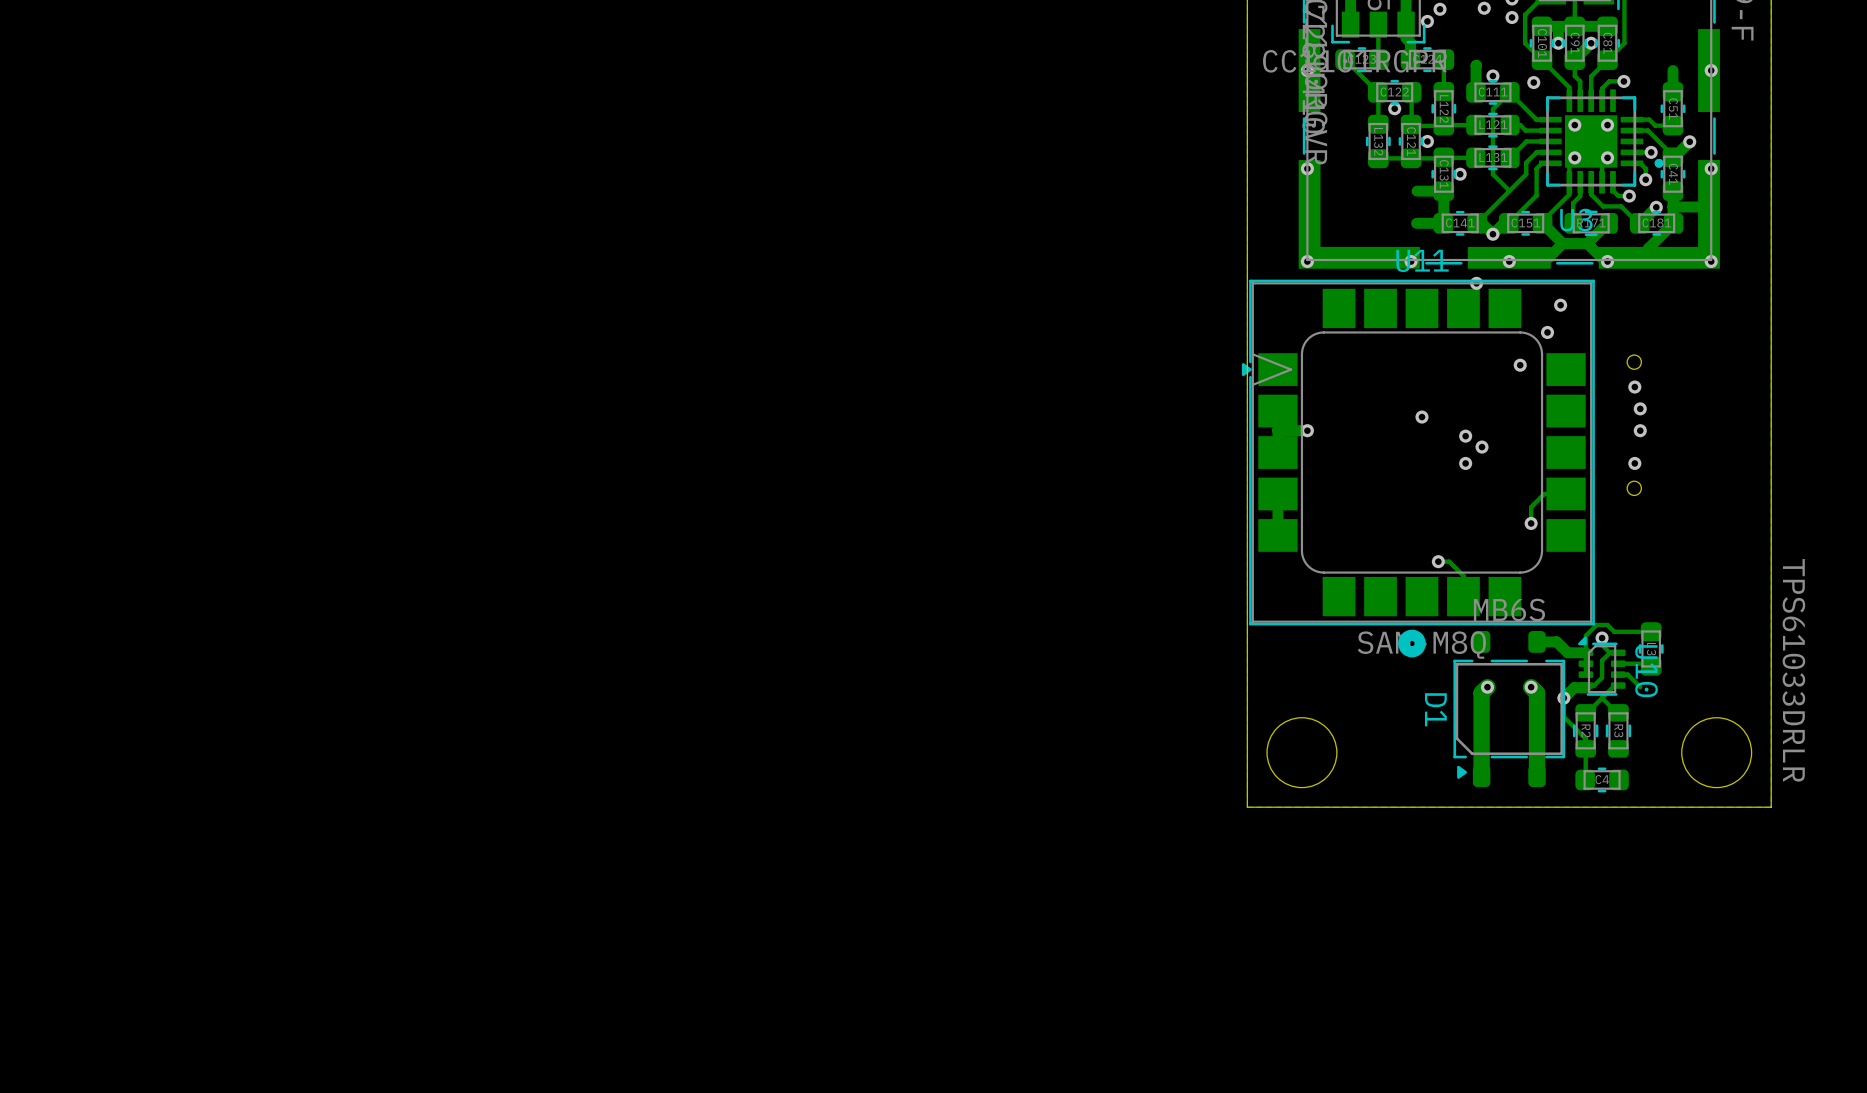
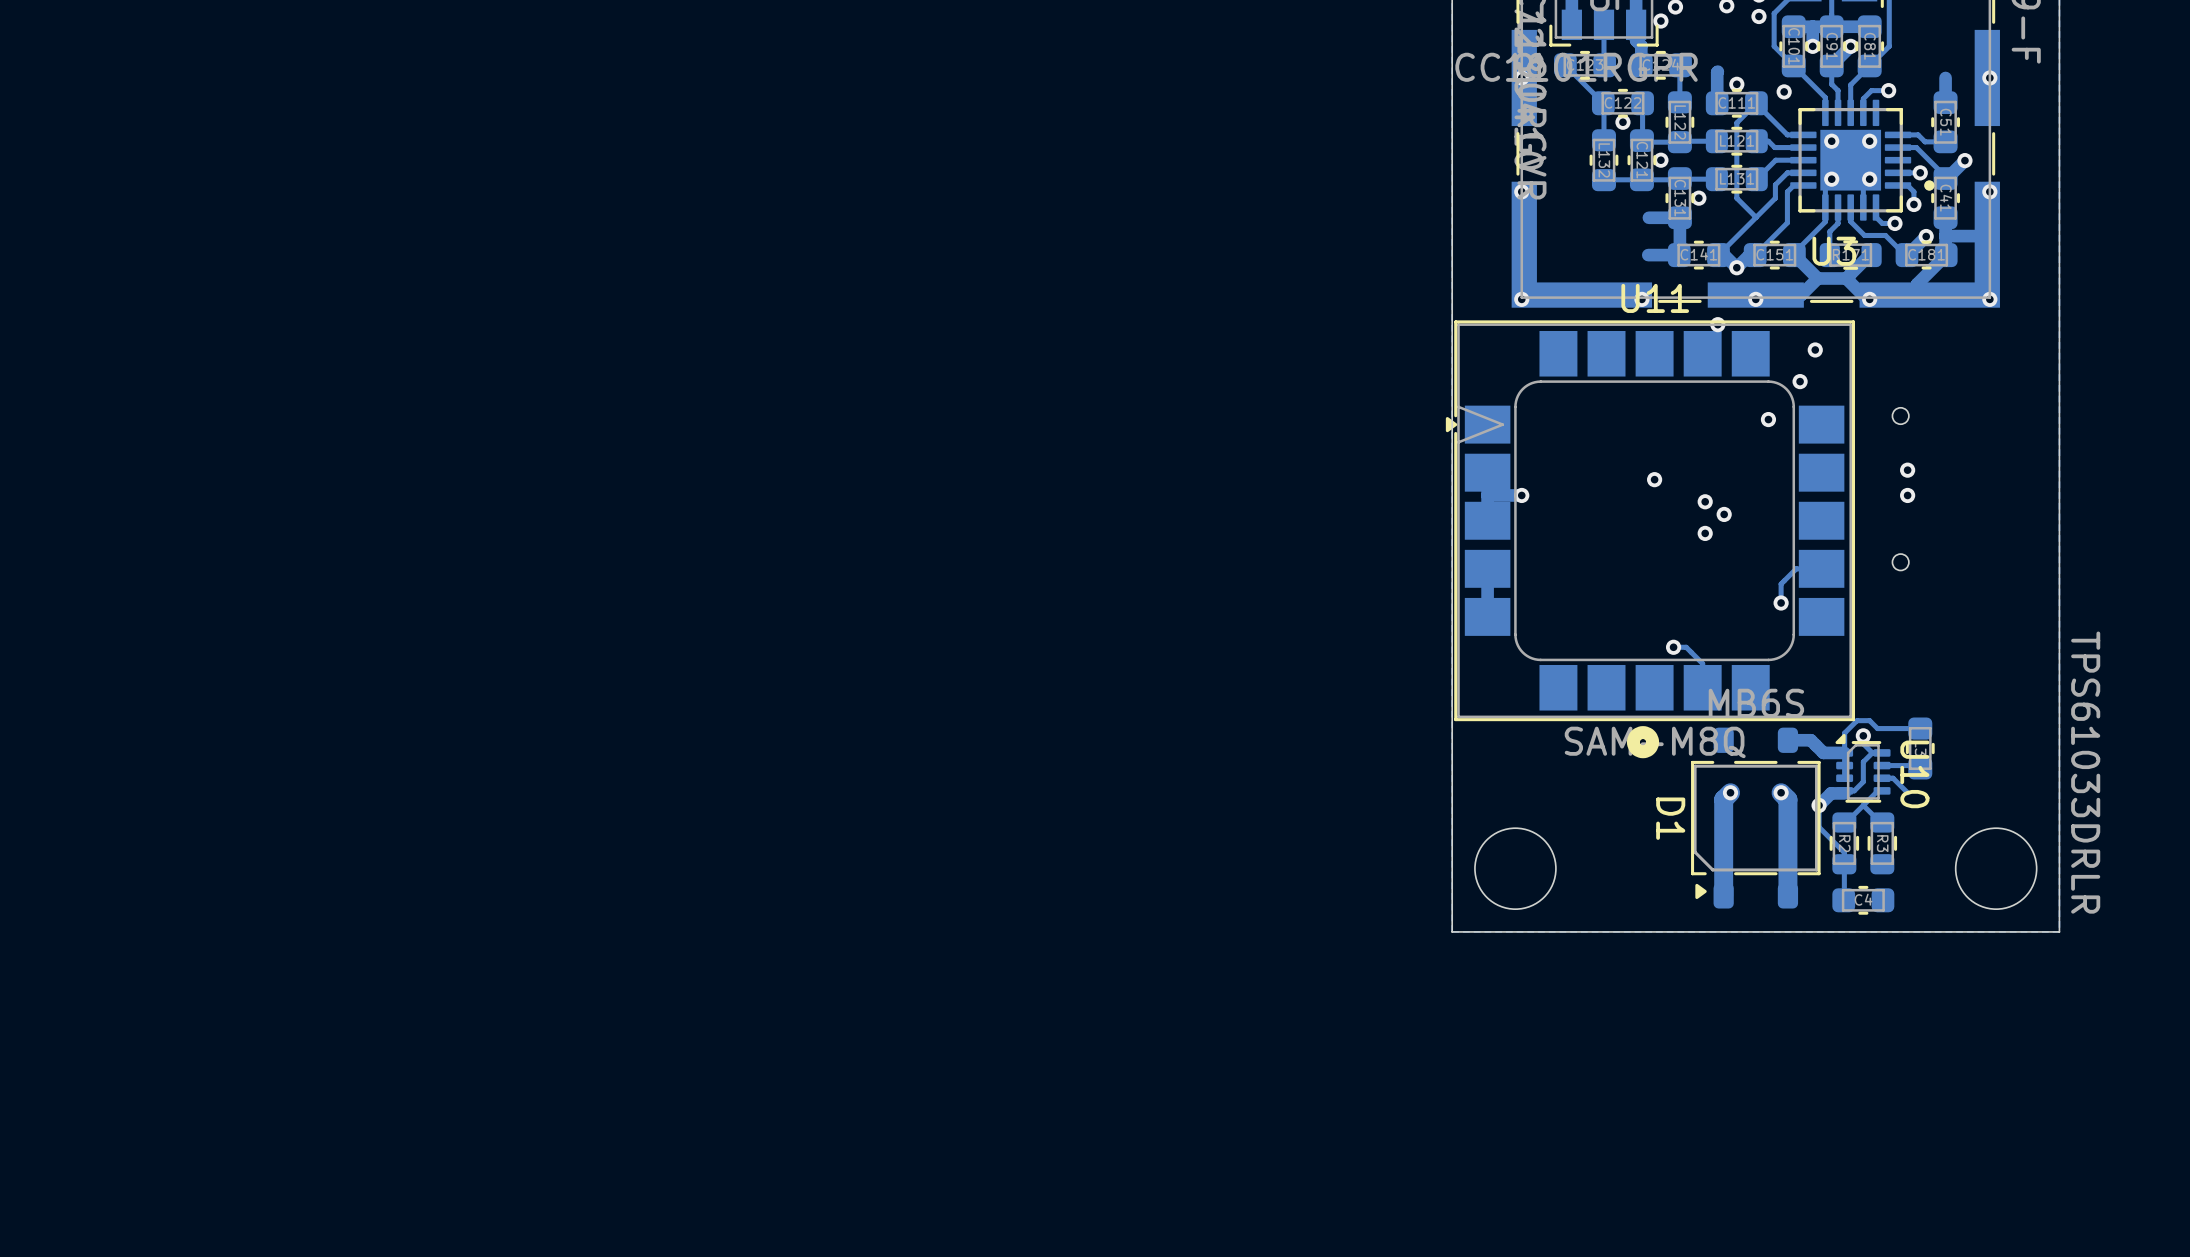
via: (1634, 387) -> none
via: (1634, 463) -> none

